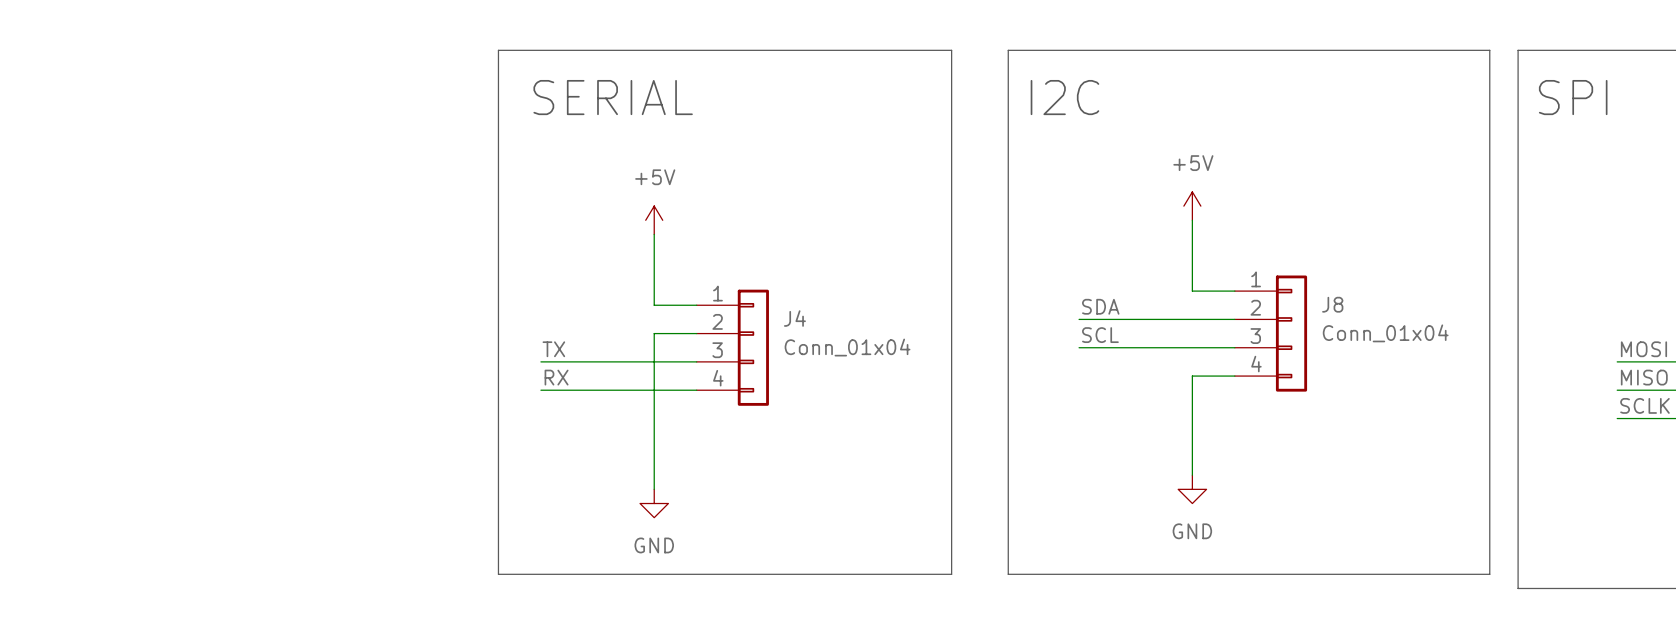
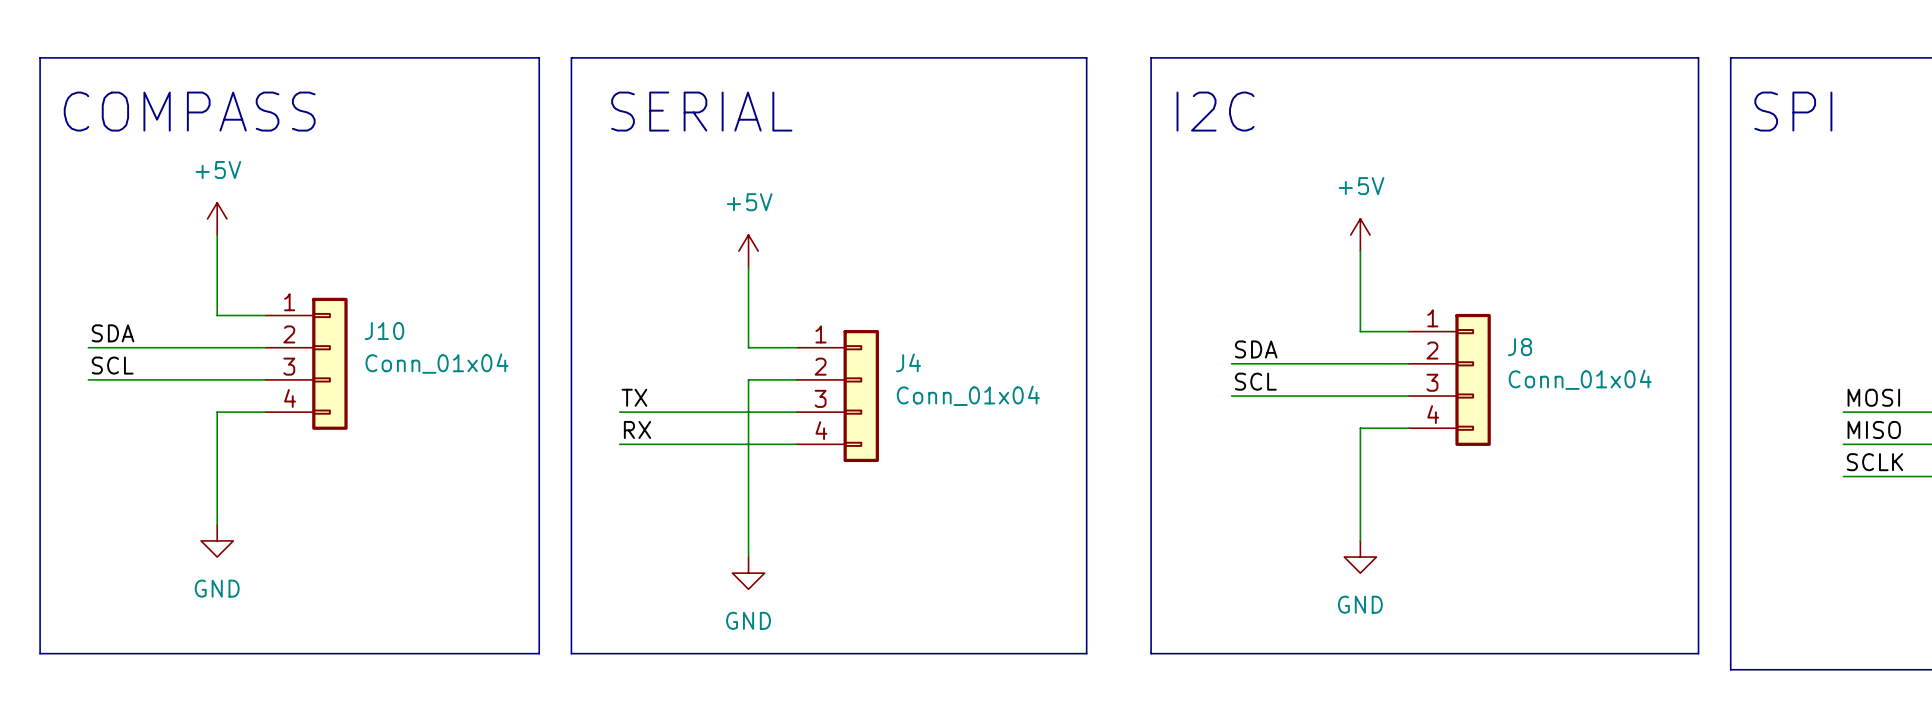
line: none -> (40, 57) (539, 57) (539, 653) (40, 653) (40, 57)
text: none -> COMPASS (189, 111)
power symbol: none -> +5V (217, 218)
wire: none -> (217, 235) (217, 315) (265, 315)
label: none -> SDA (113, 333)
wire: none -> (88, 347) (265, 347)
J10: none -> Conn_01x04 (306, 363)
label: none -> SCL (112, 365)
wire: none -> (88, 379) (265, 379)
wire: none -> (265, 412) (217, 412) (217, 524)
power symbol: none -> GND (217, 540)

